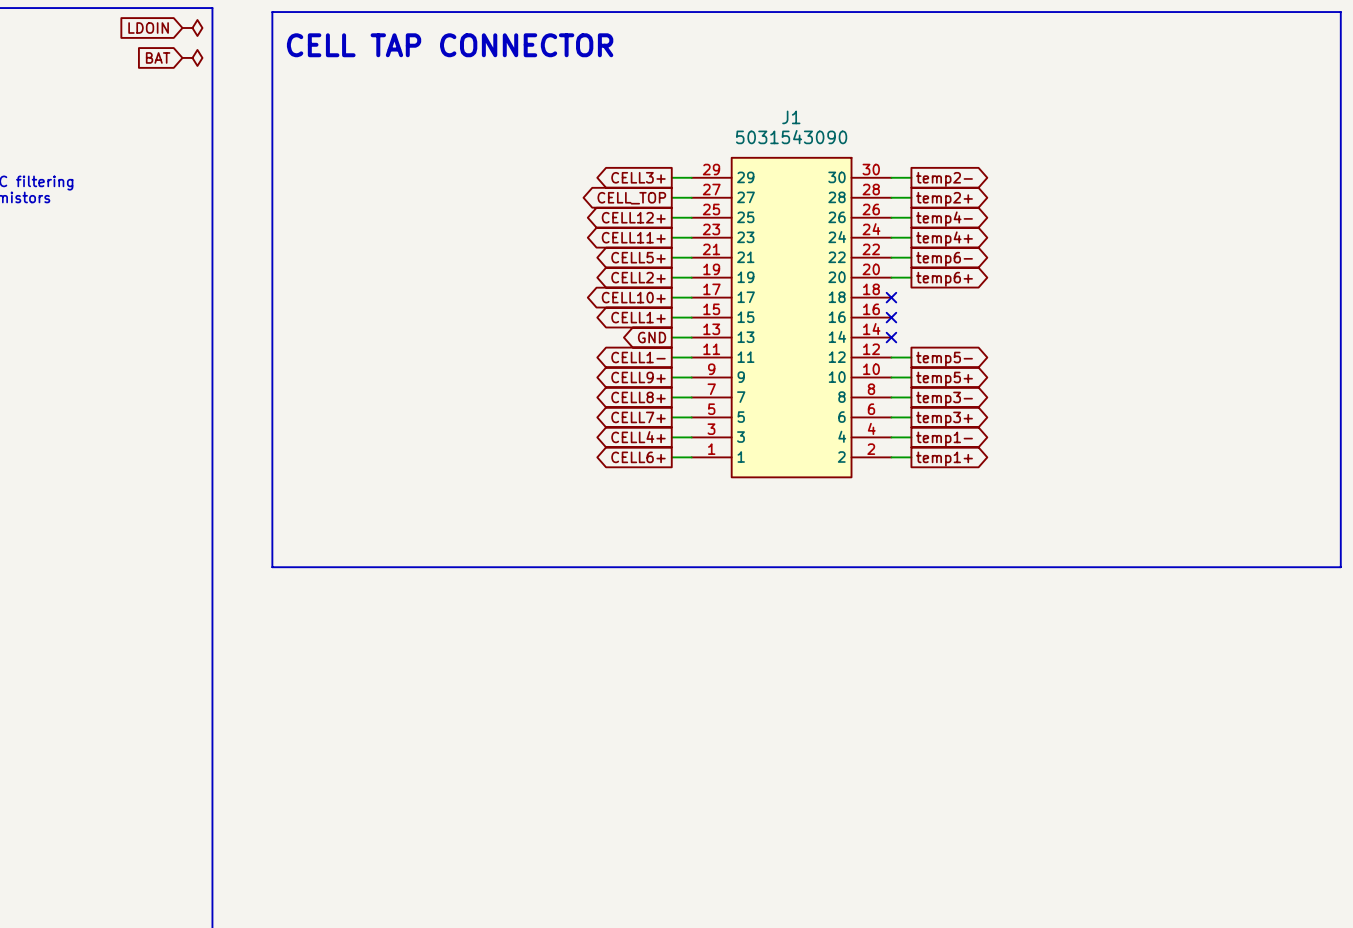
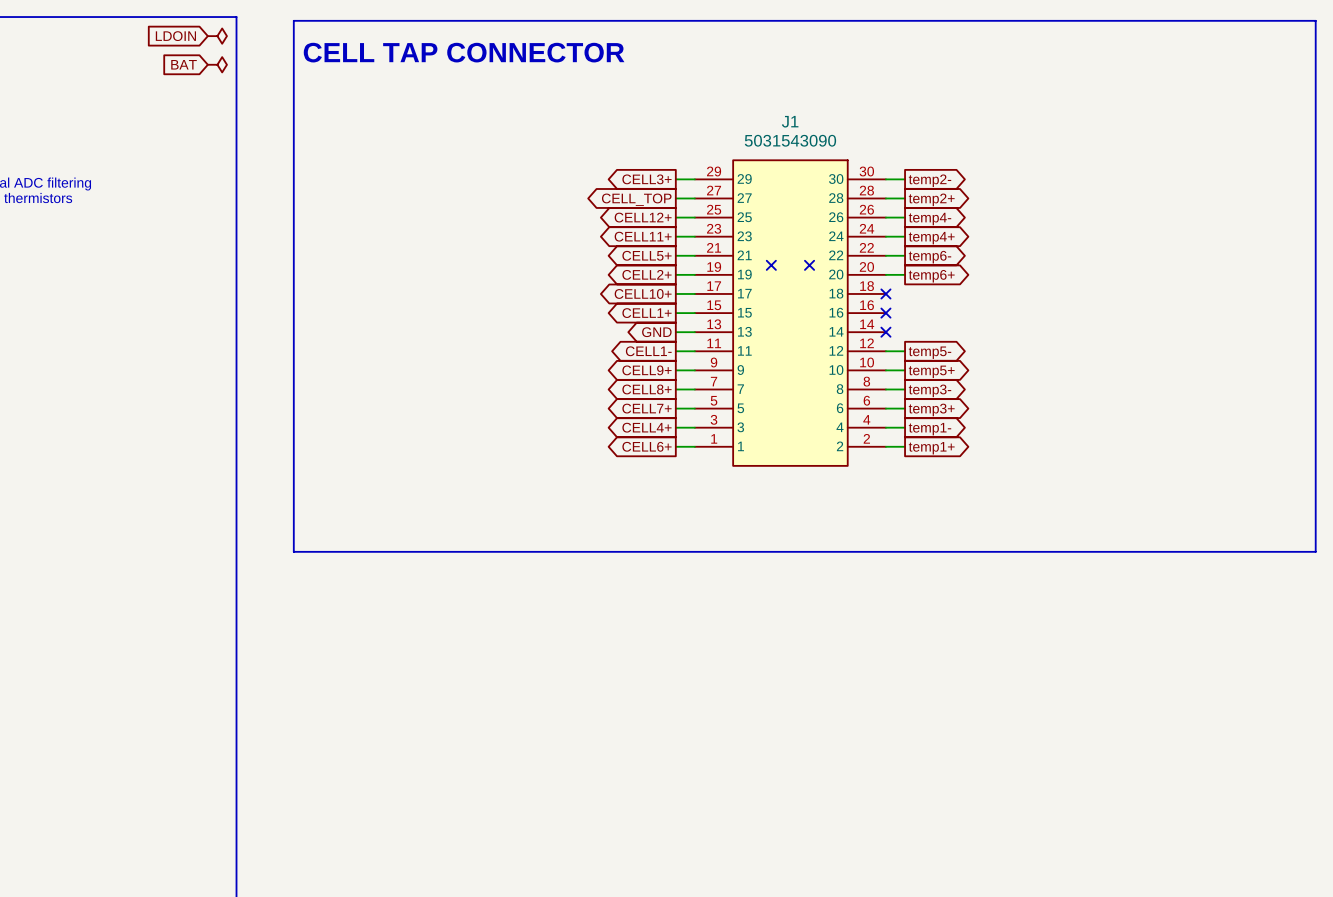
no-connect mark: none -> (771, 265)
no-connect mark: none -> (809, 265)

